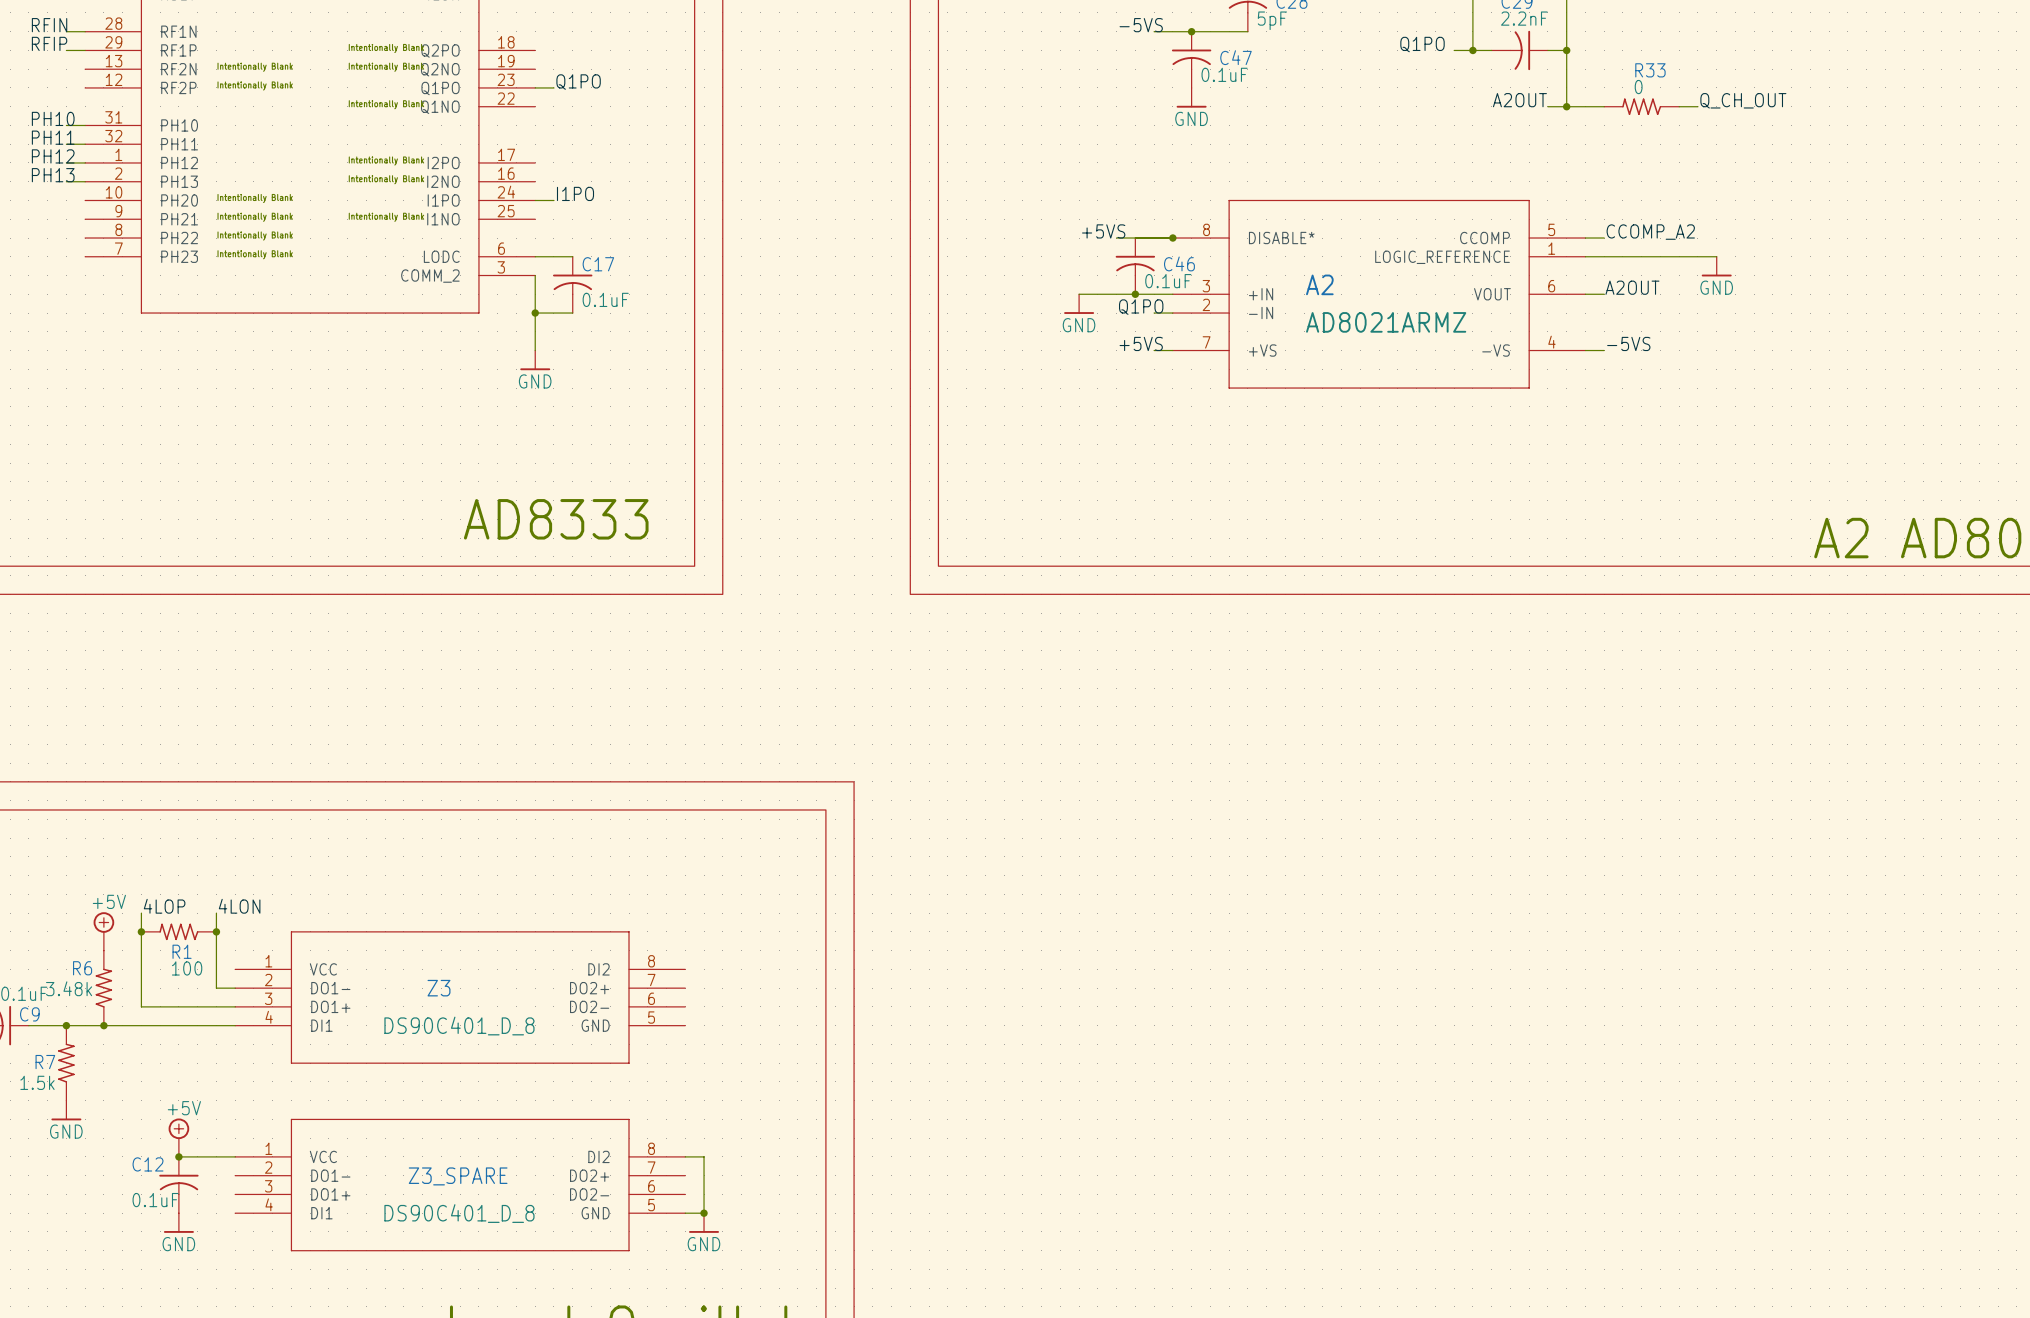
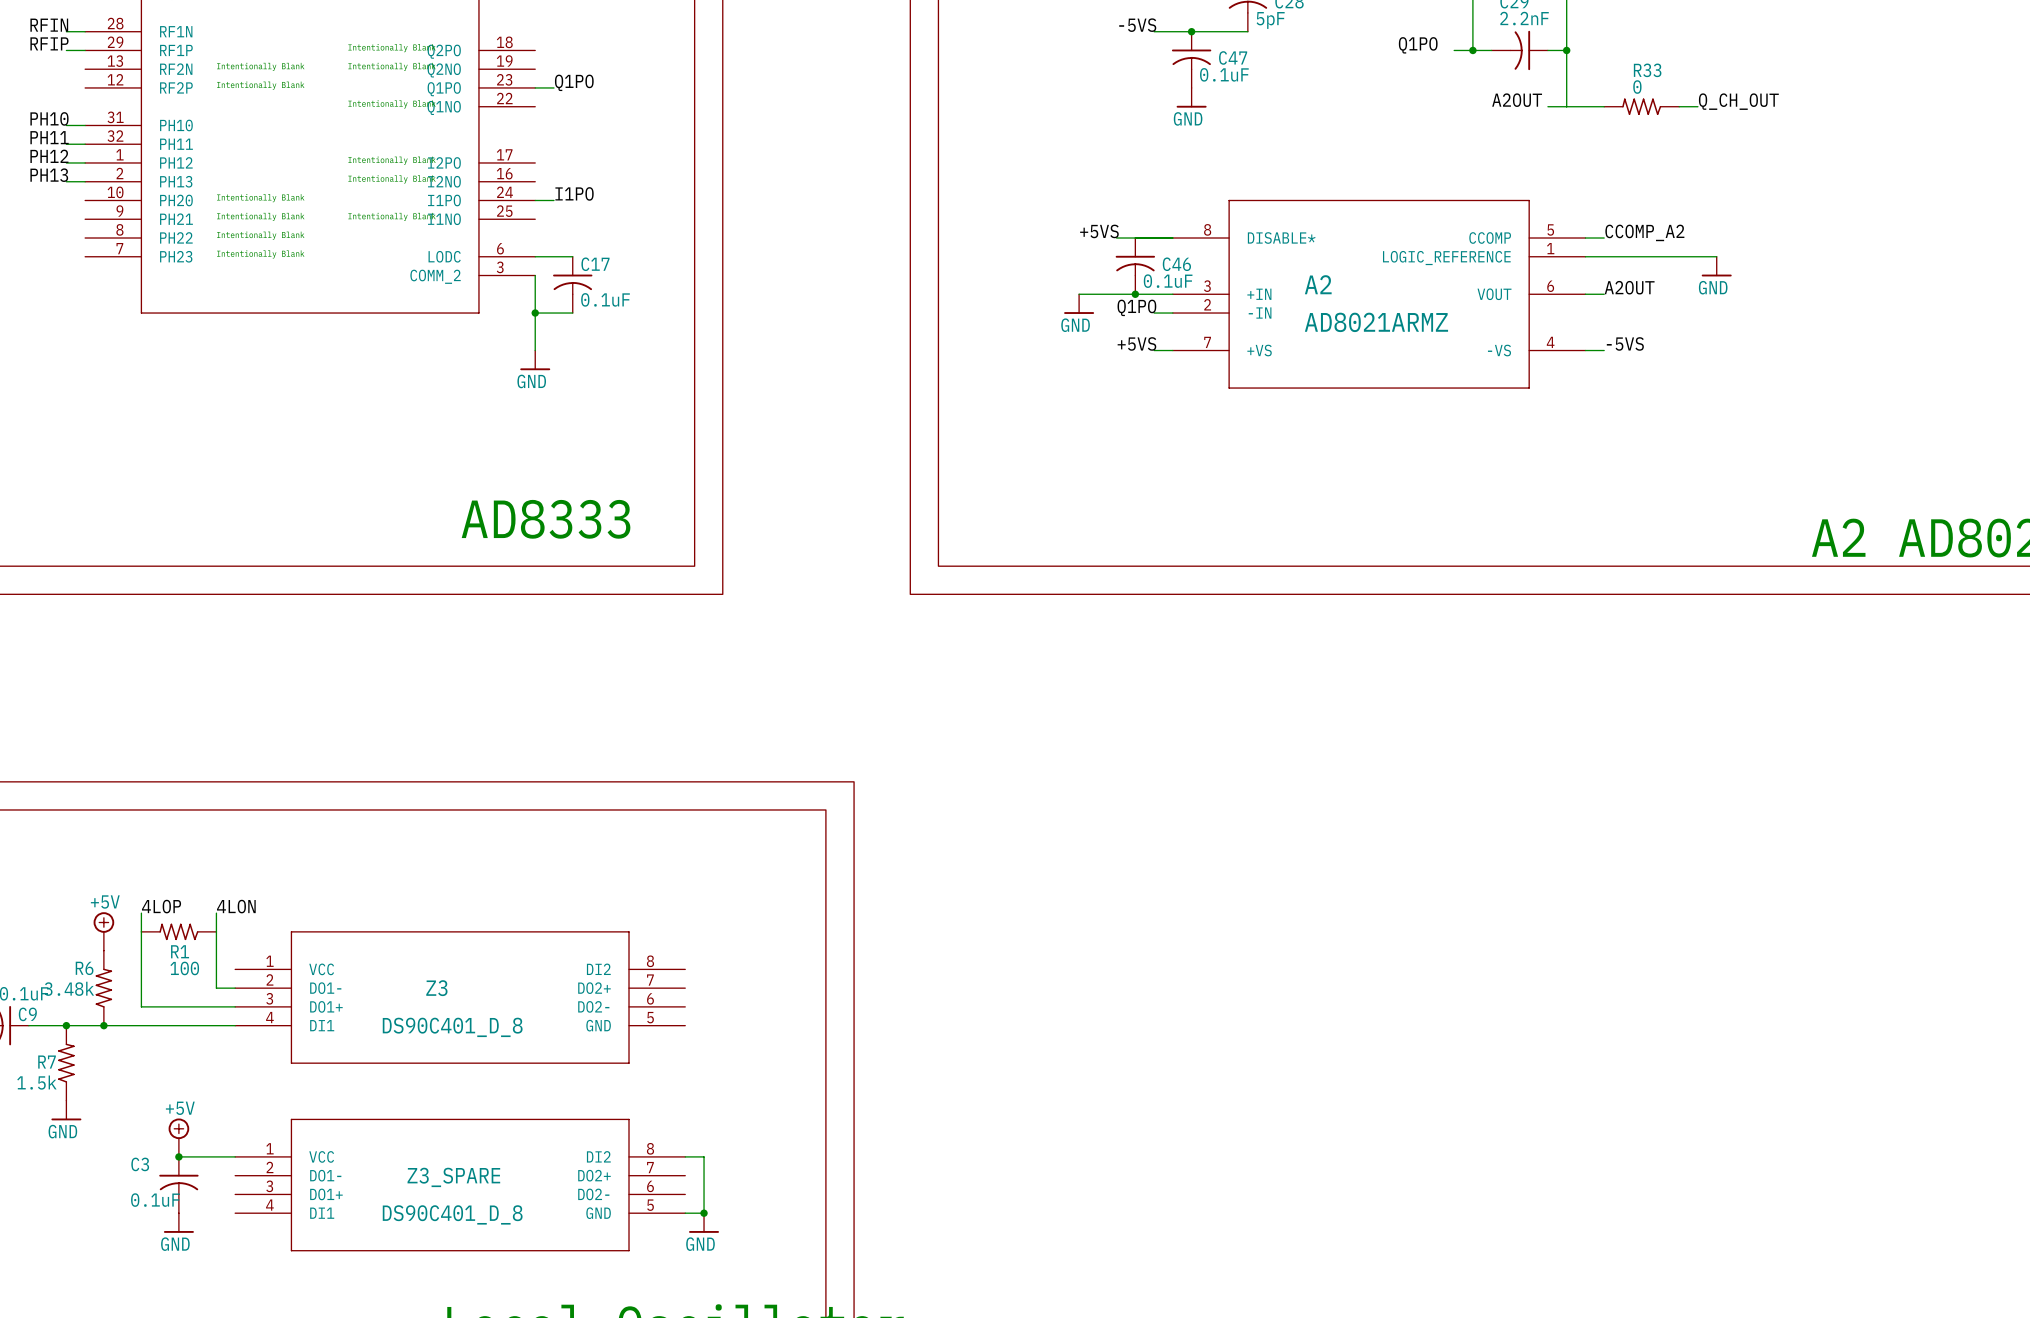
junction: (1566, 106) -> none
junction: (1172, 238) -> none
junction: (141, 931) -> none
junction: (216, 931) -> none
C12 name: C12 (148, 1164) -> C3 (140, 1164)

